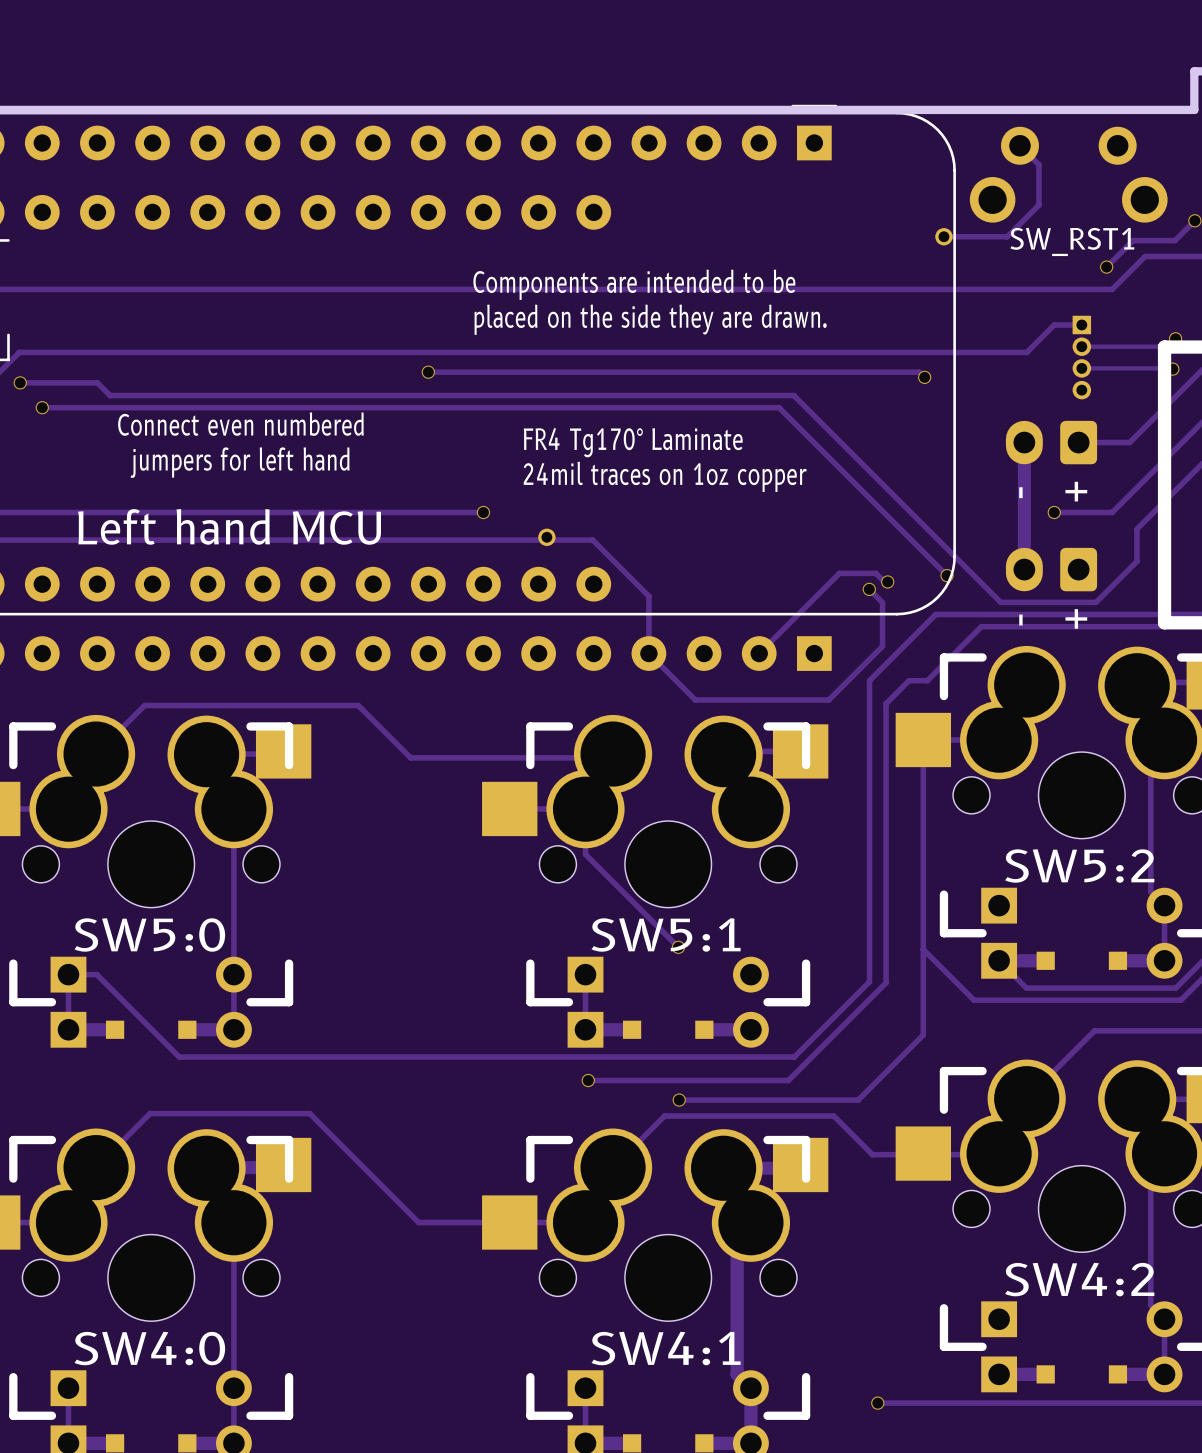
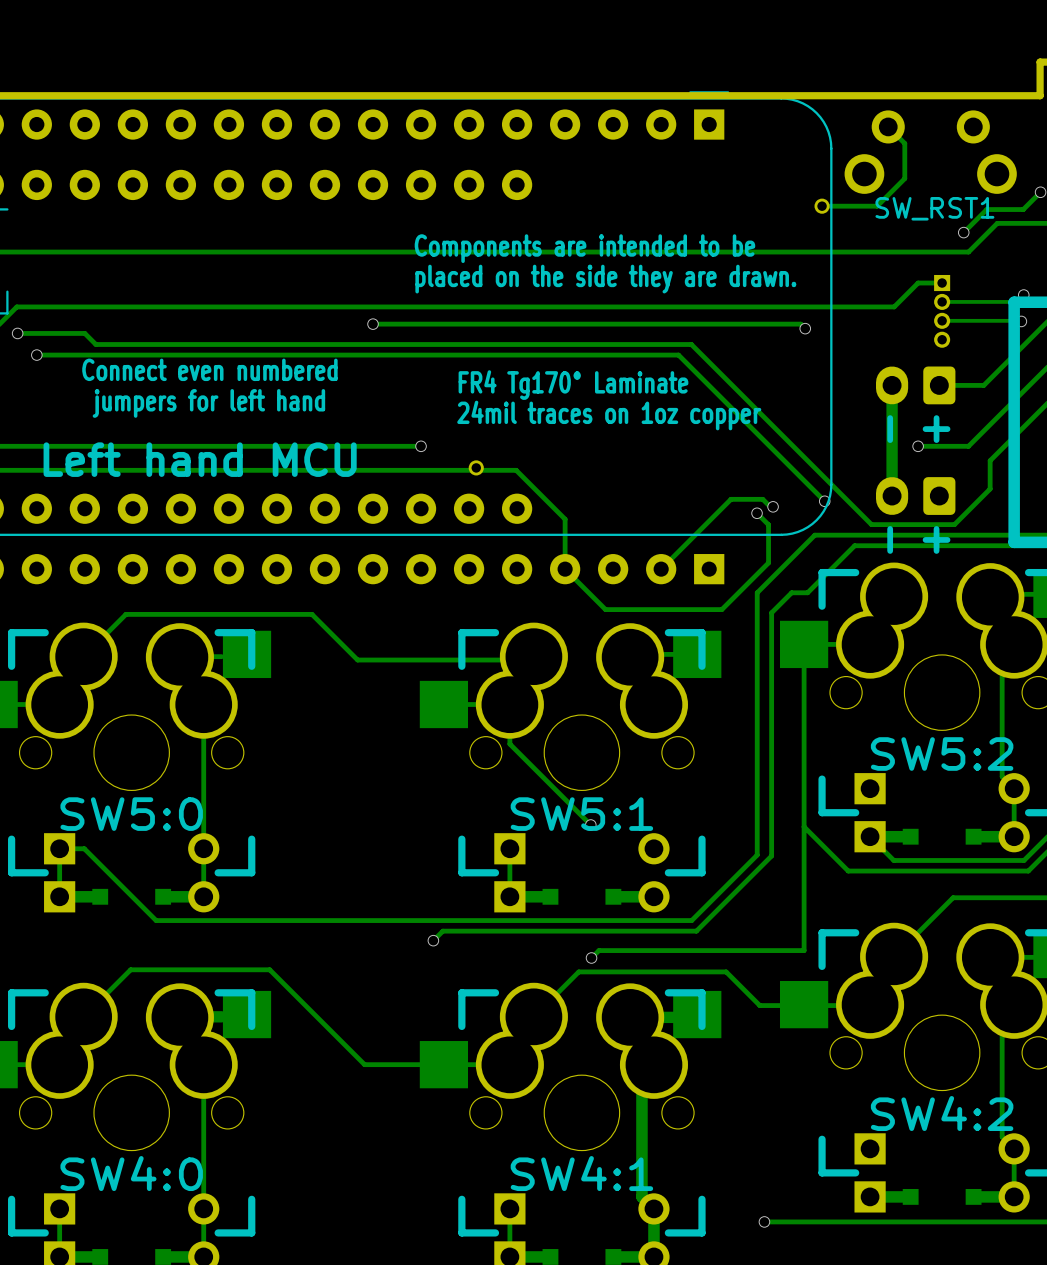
track: (923, 1034) (858, 1100) (679, 1100) -> (804, 901) (804, 950) (598, 950) (591, 958)
track: (799, 1069) (788, 1080) (588, 1080) -> (696, 931) (442, 931) (433, 940)
via position: (588, 1080) -> (433, 940)

